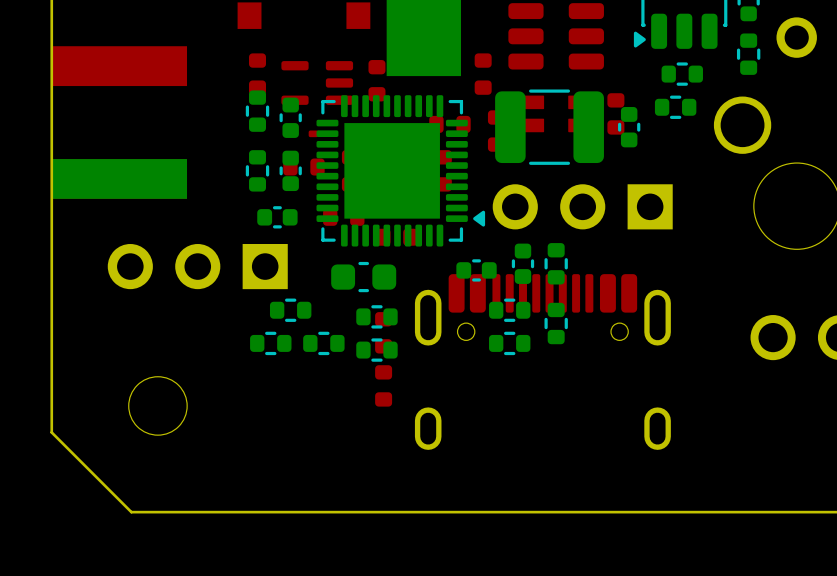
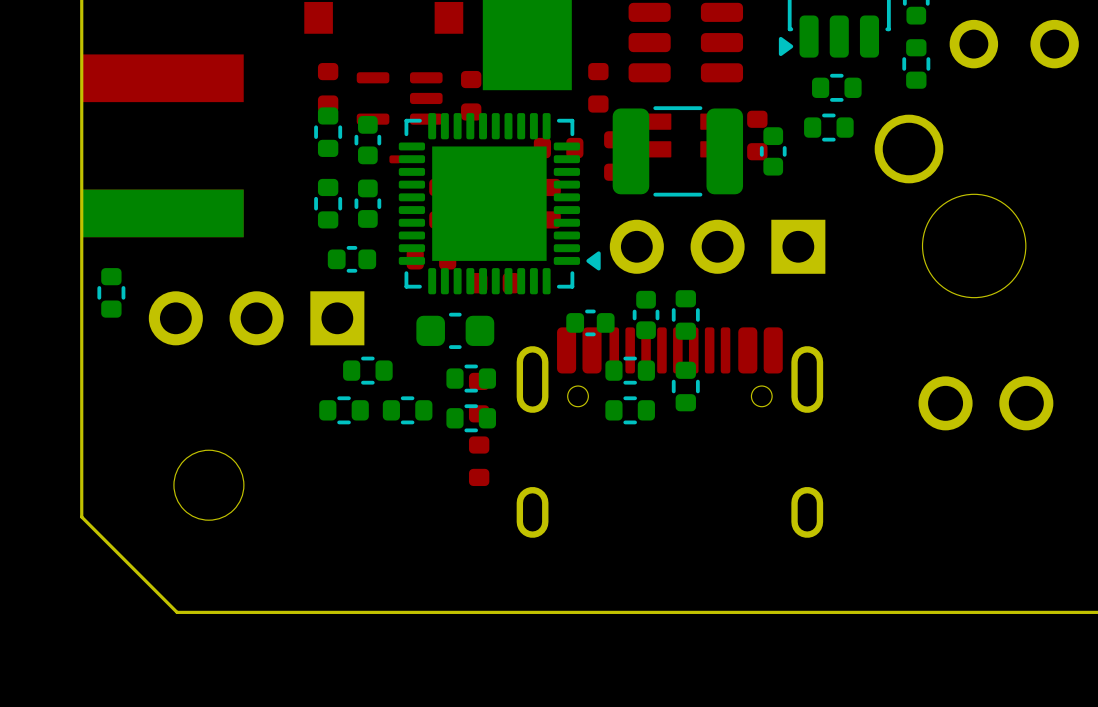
part: (303, 167) -> none
part: none -> (111, 292)

